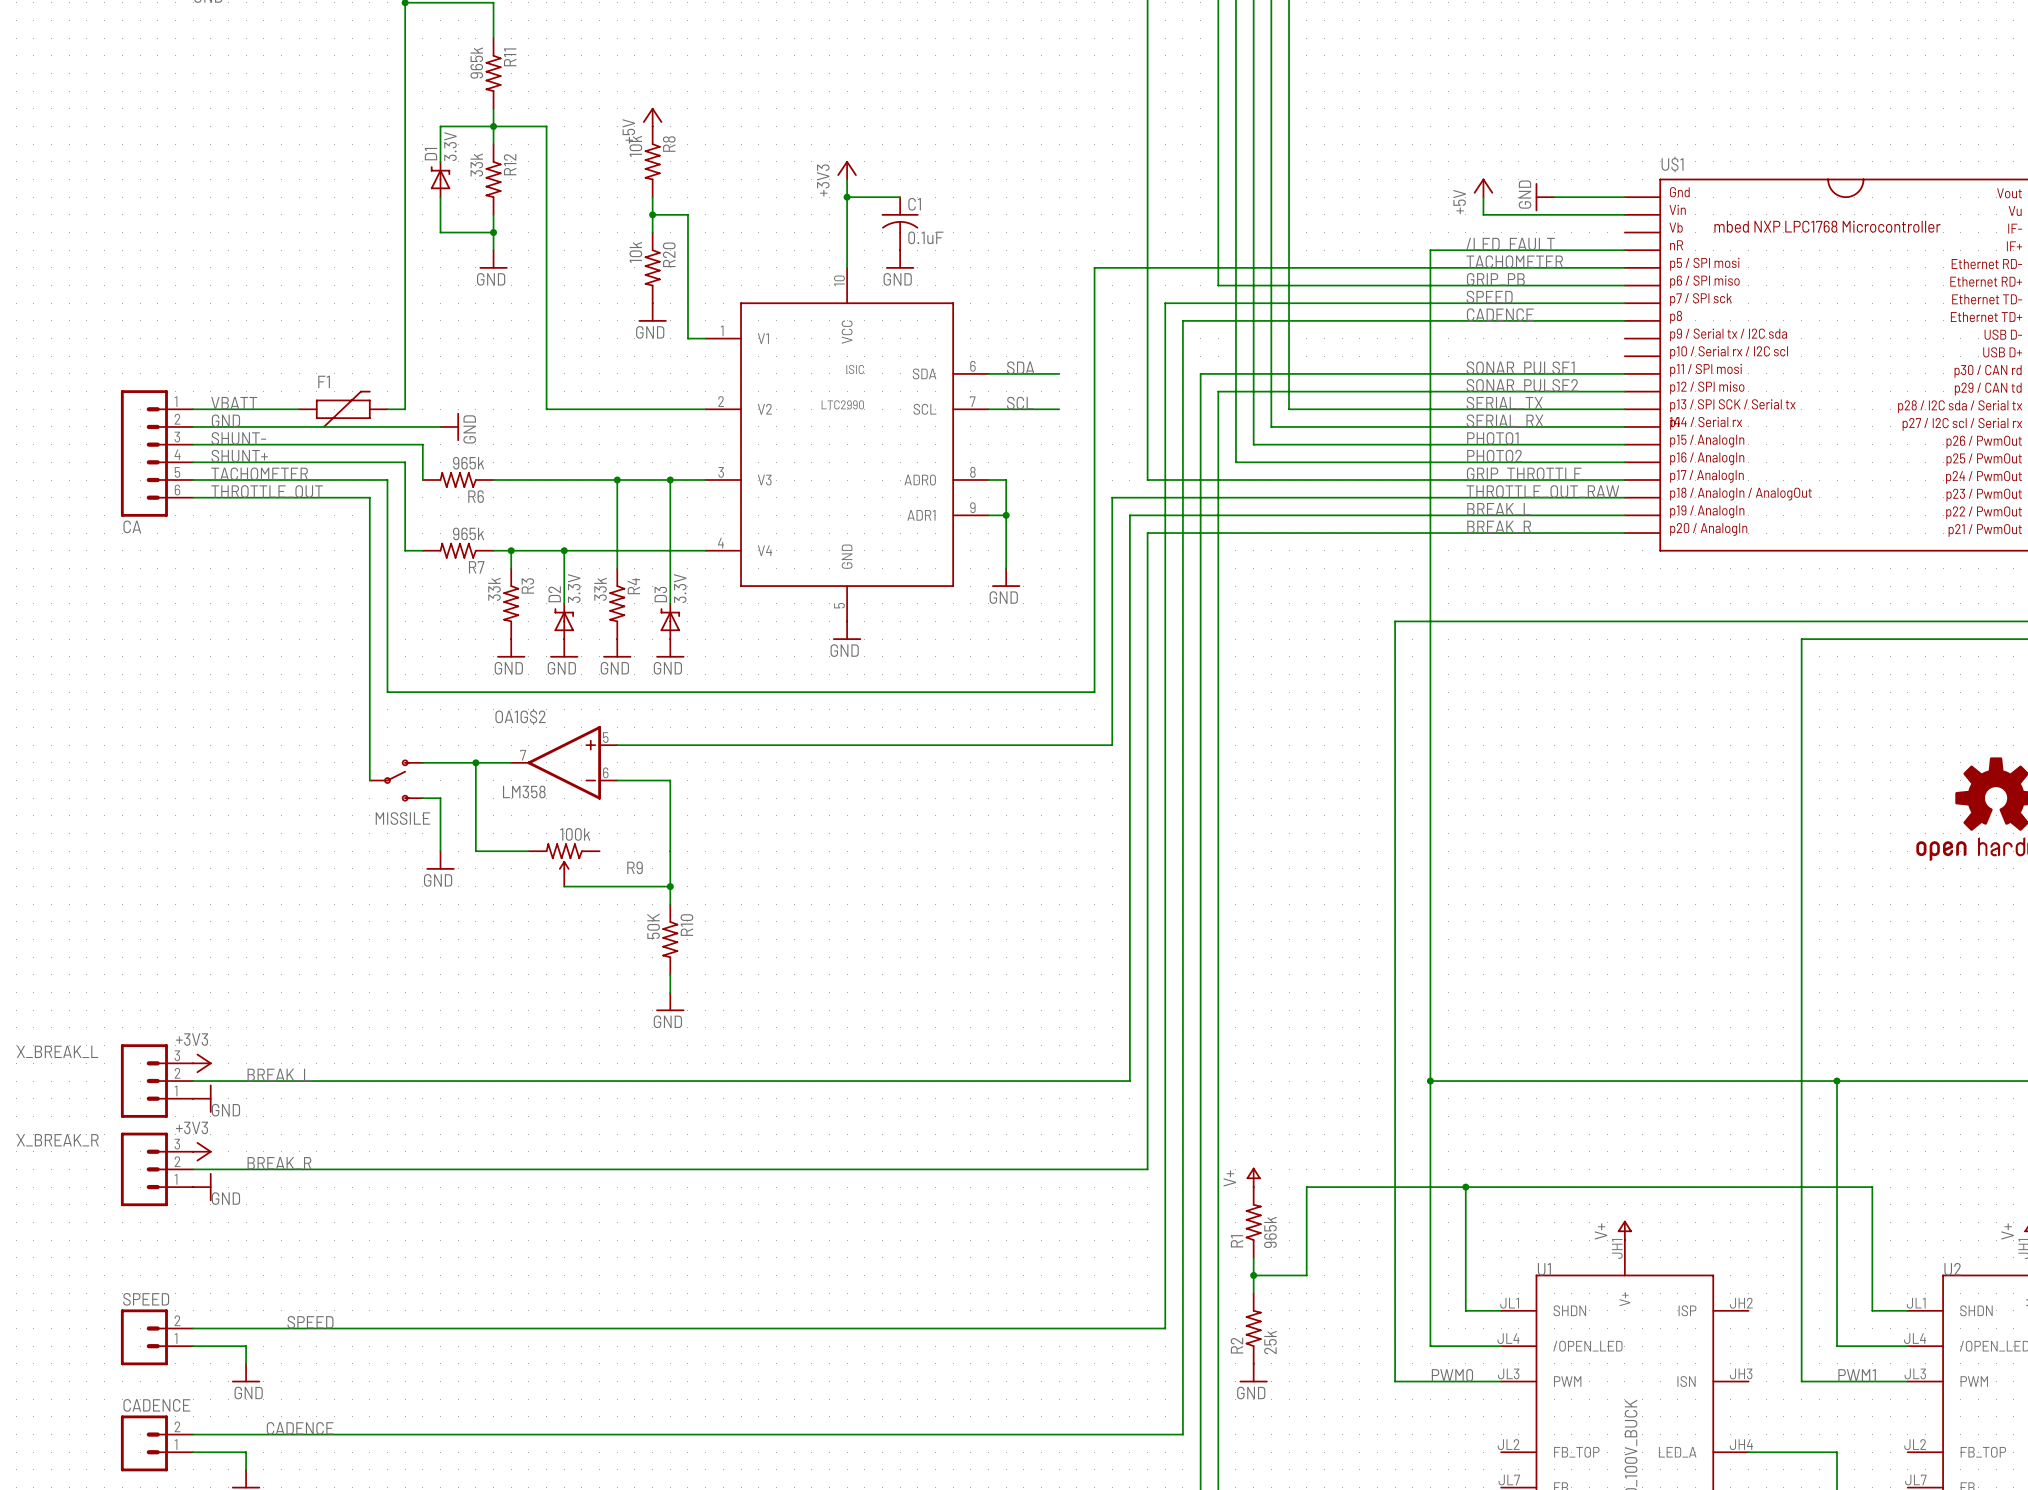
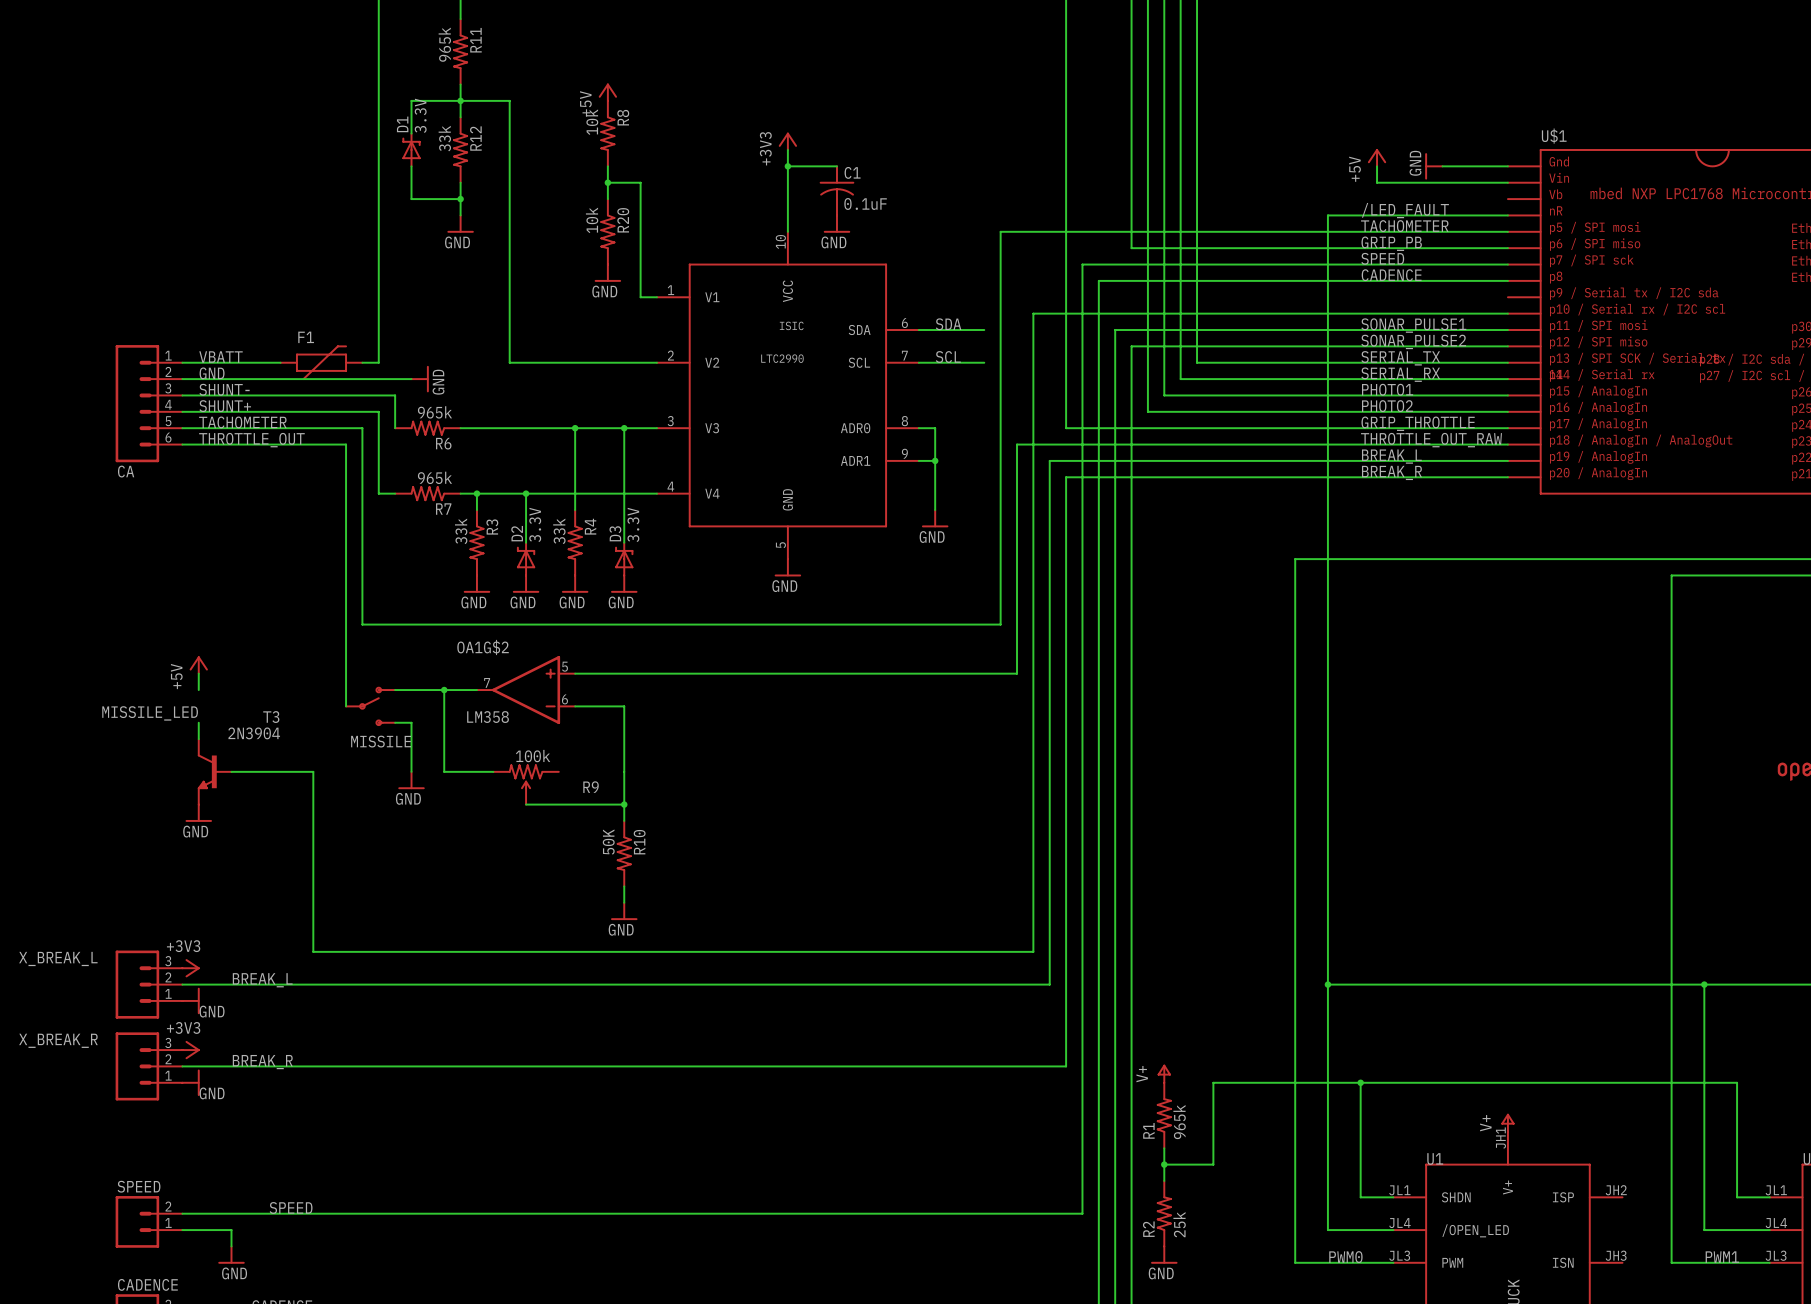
wire: (1094, 267) (1094, 497) -> (1017, 231) (1000, 231) (1000, 624)
wire: none -> (1507, 313) (1033, 313) (1033, 444) (1017, 444)
wire: (1076, 692) (1094, 692) -> none
power symbol: none -> +5V (198, 665)
wire: none -> (198, 673) (198, 690)
wire: (1094, 745) (1112, 745) -> (1017, 673) (1017, 624)
wire: none -> (1033, 673) (1033, 951) (313, 951) (313, 771) (231, 771)
label: none -> MISSILE_LED (150, 713)
wire: none -> (198, 722) (198, 739)
T3: none -> 2N3904 (214, 771)
power symbol: none -> GND (198, 813)

